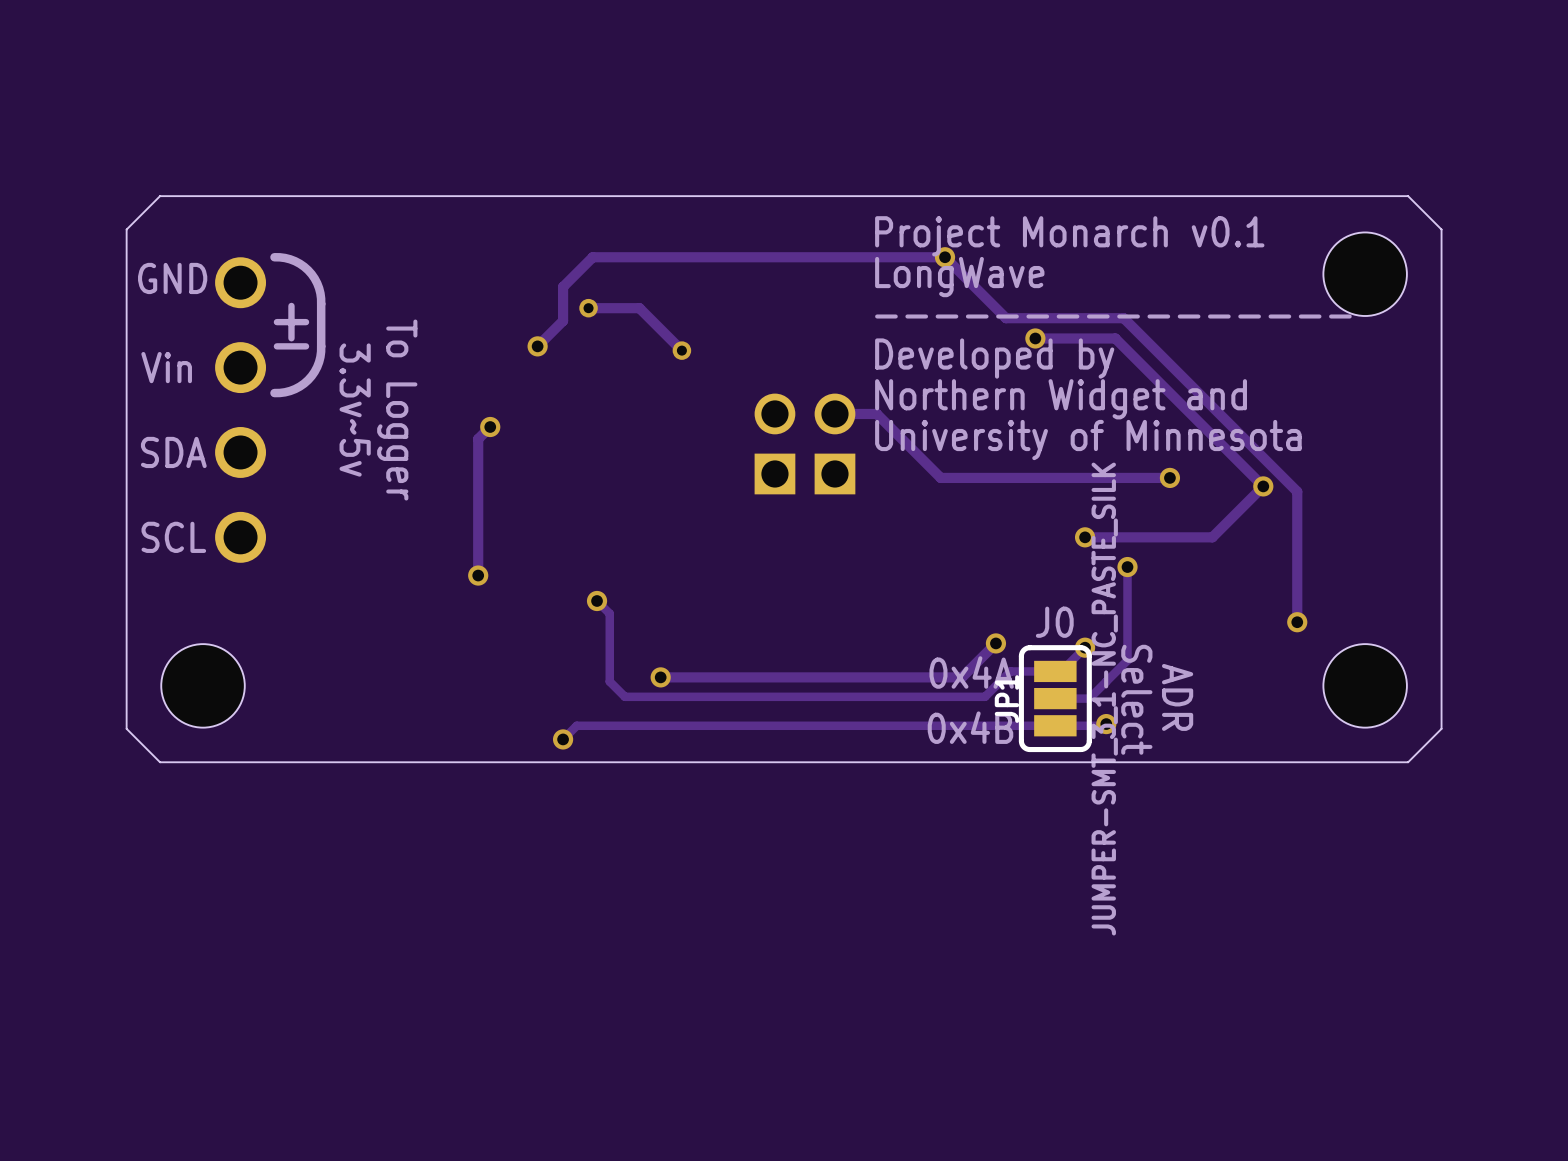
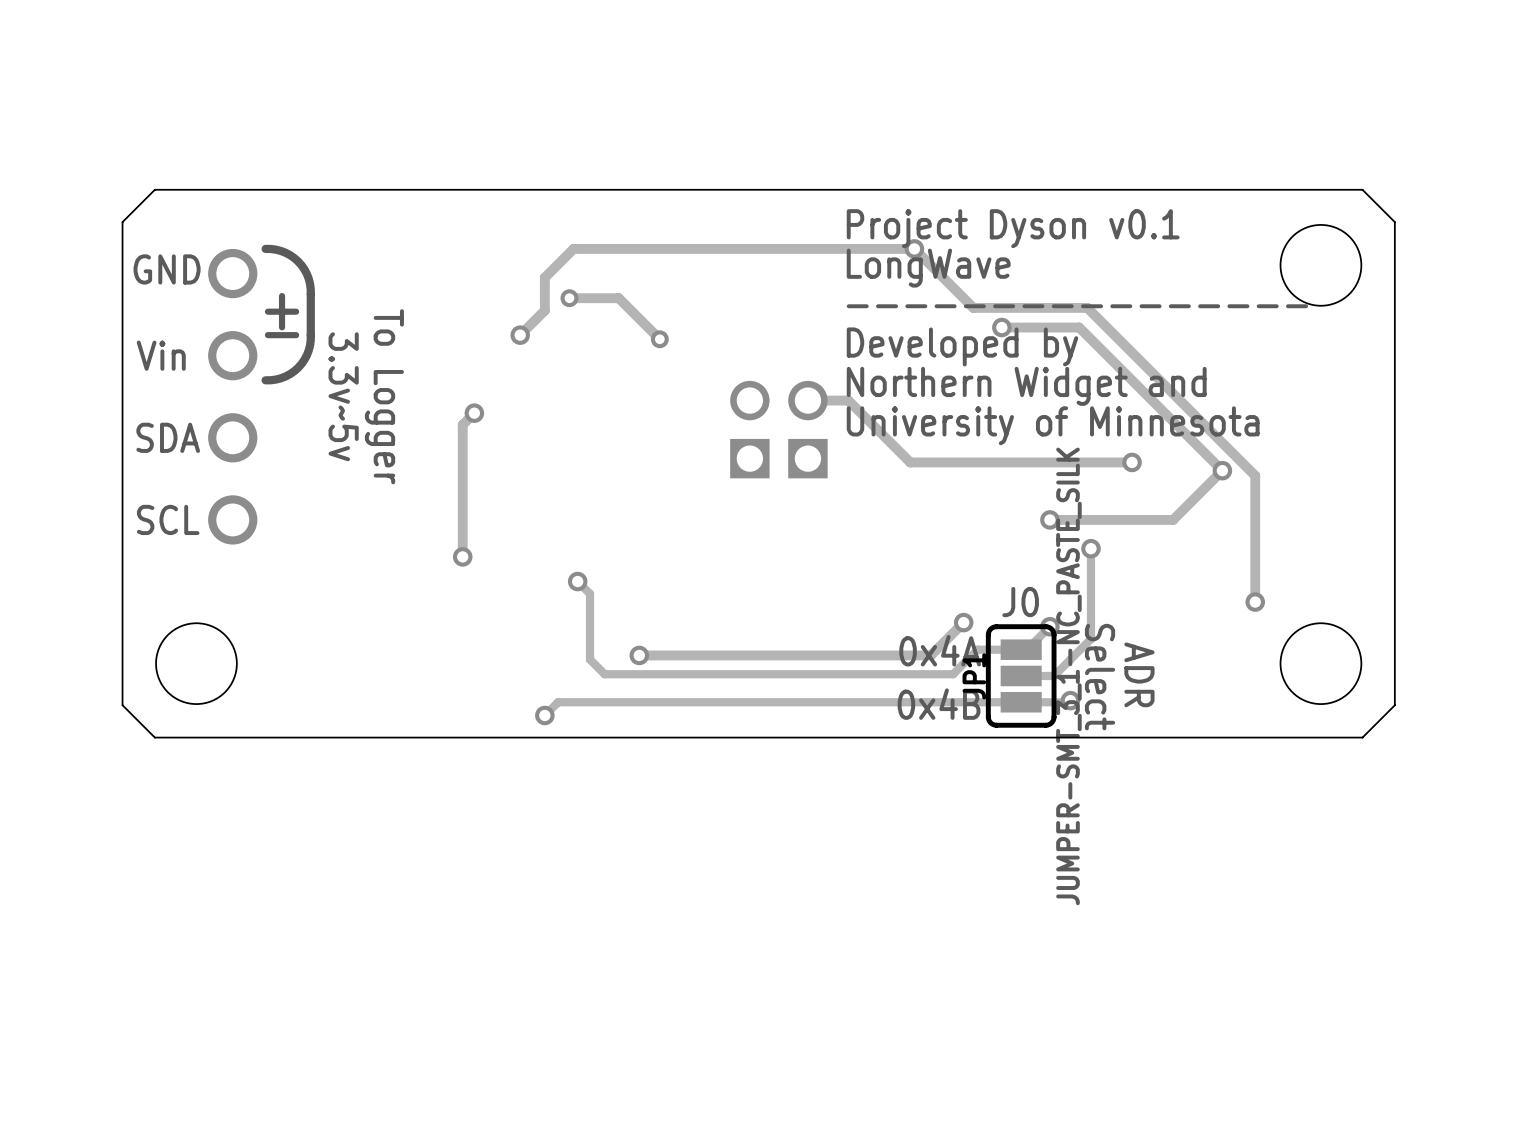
text: Project Monarch v0.1 (1069, 236) -> Project Dyson v0.1 (1013, 228)

